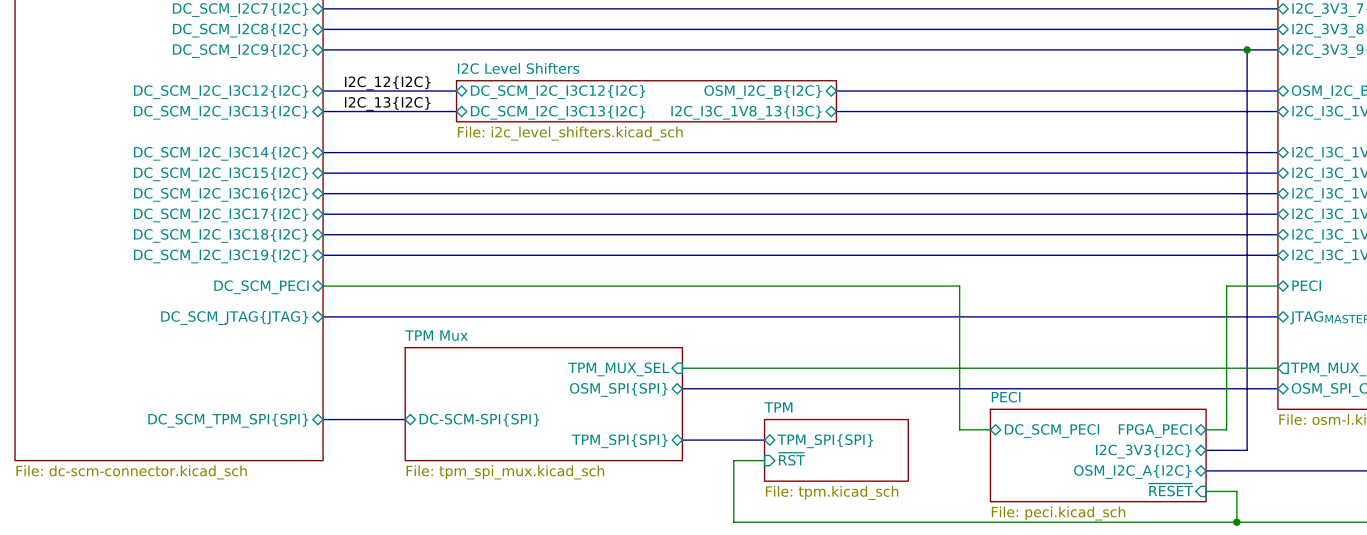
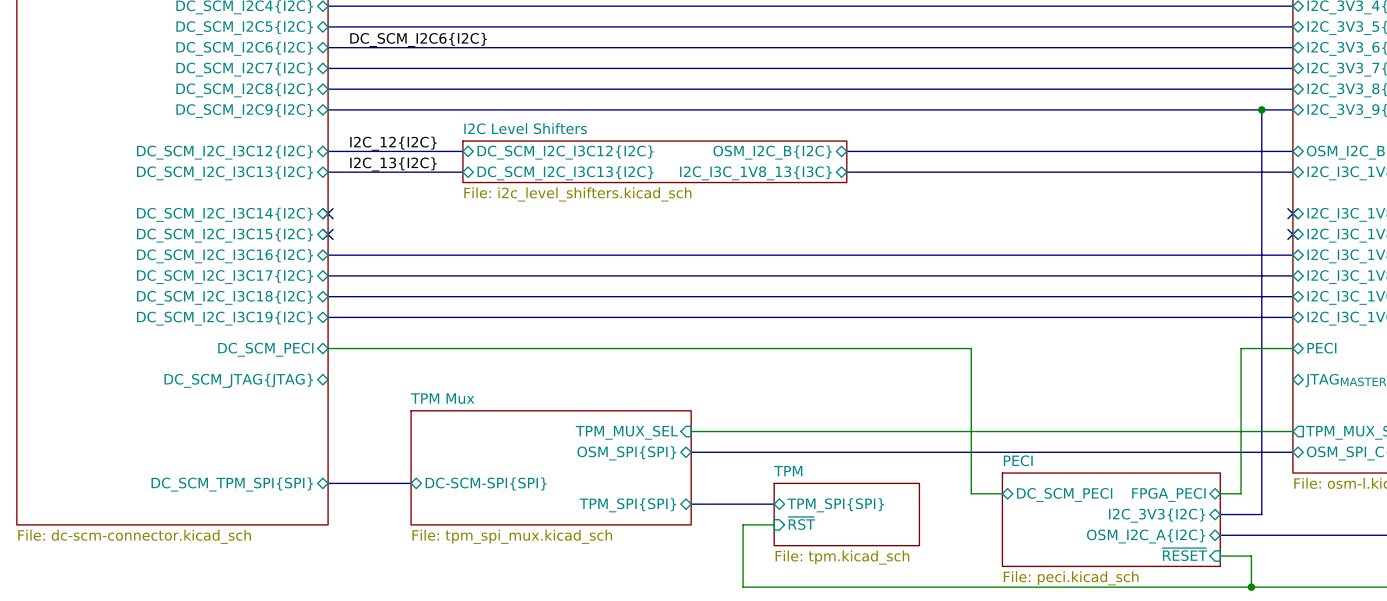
bus: (323, 152) (1277, 152) -> none
no-connect mark: none -> (328, 213)
no-connect mark: none -> (1292, 213)
bus: (323, 173) (1277, 173) -> none
no-connect mark: none -> (328, 234)
no-connect mark: none -> (1292, 234)
bus: (323, 316) (1277, 316) -> none

